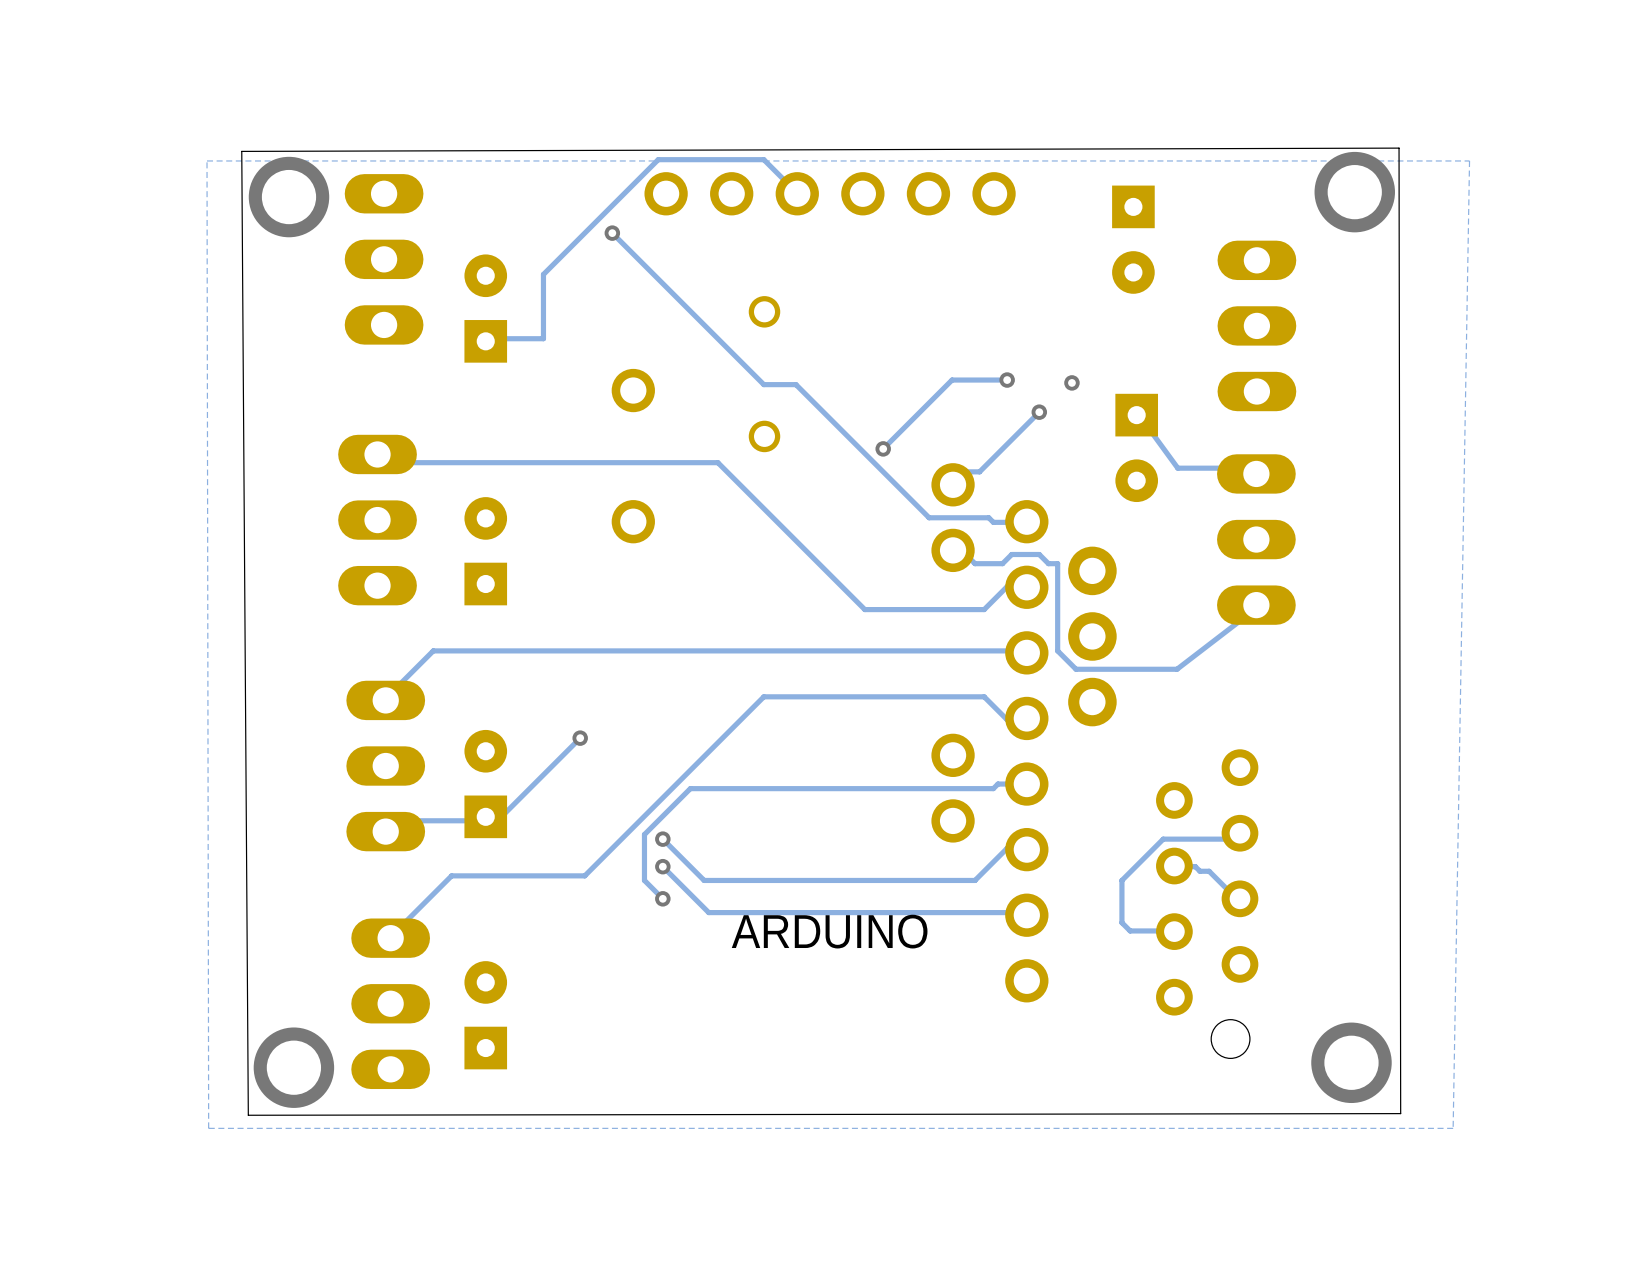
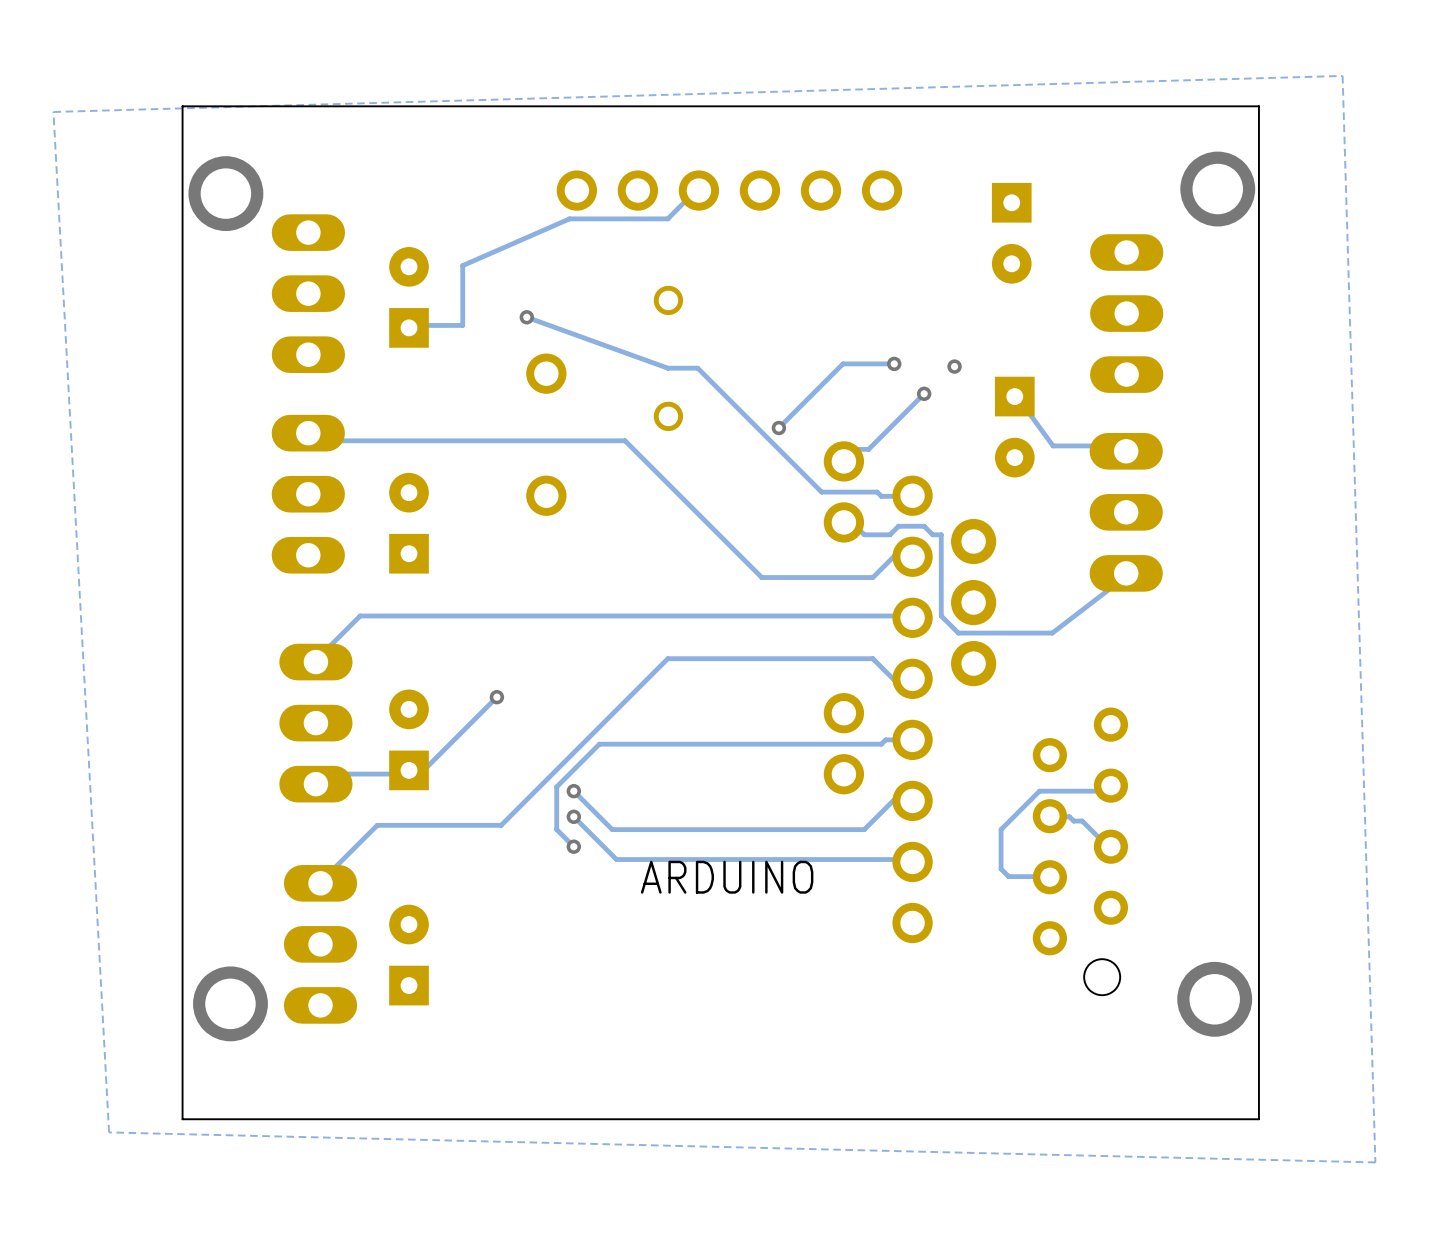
board edge: (1399, 148) (241, 151) (248, 1115) (1400, 1113) (1399, 148) -> (1258, 106) (1258, 1119) (182, 1119) (182, 106) (1258, 106)
zone outline: (1469, 160) (1453, 1128) (208, 1128) (207, 160) (1469, 160) -> (1342, 75) (1375, 1162) (109, 1132) (53, 111) (1342, 75)
track: (795, 191) (763, 159) (658, 159) (543, 274) -> (697, 188) (667, 218) (569, 218) (462, 265)
track: (612, 233) (763, 384) -> (526, 317) (667, 368)
via position: (612, 233) -> (526, 317)
part position: (384, 259) -> (308, 293)

